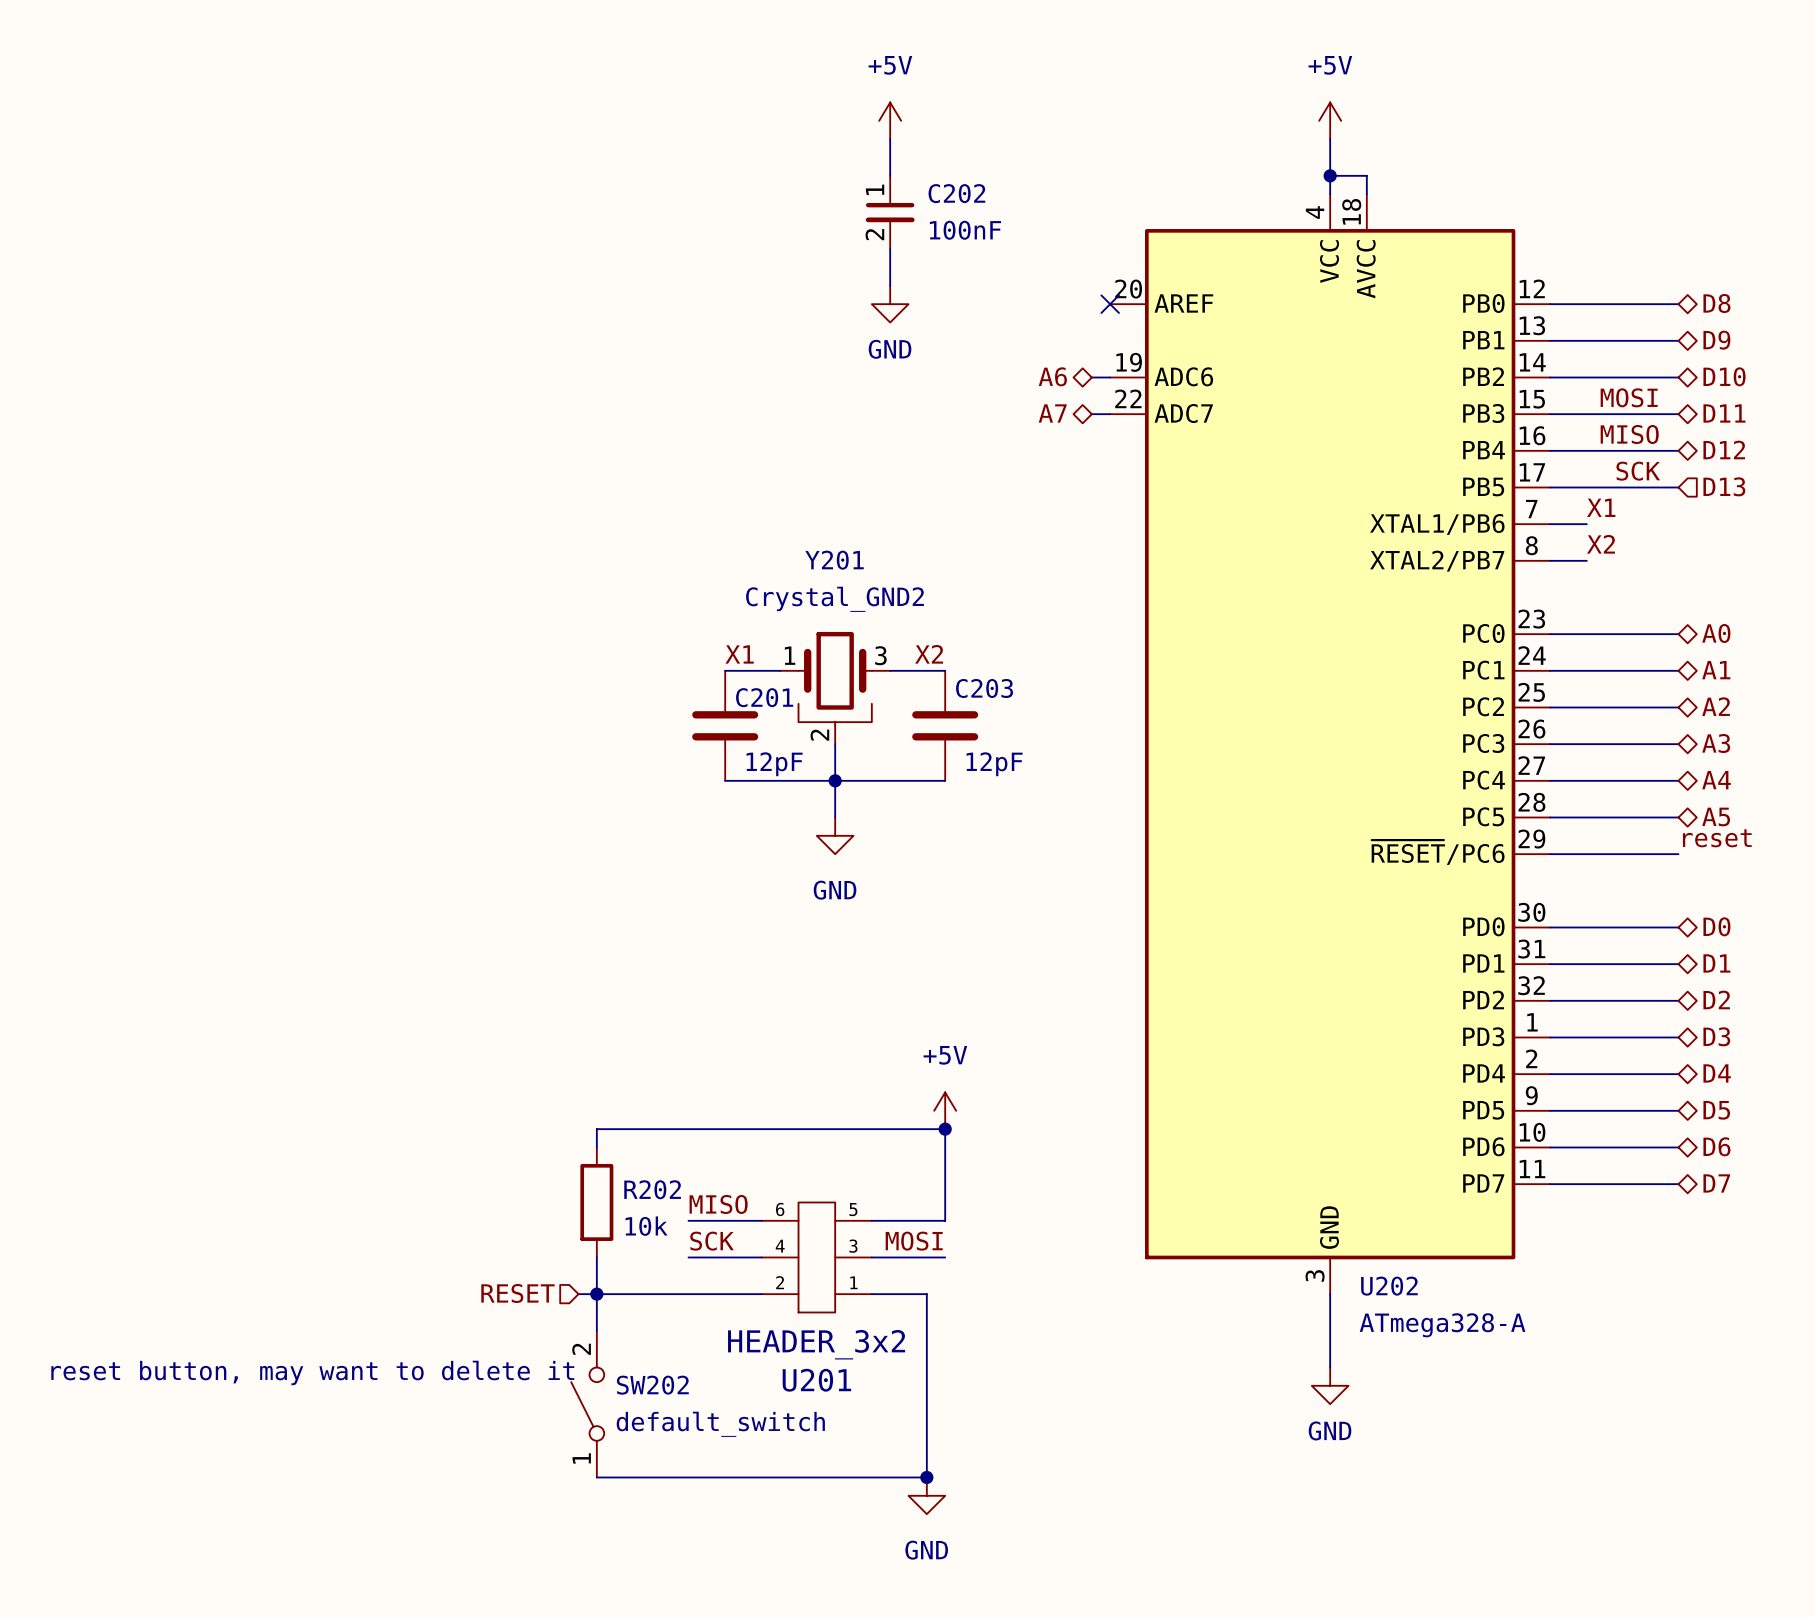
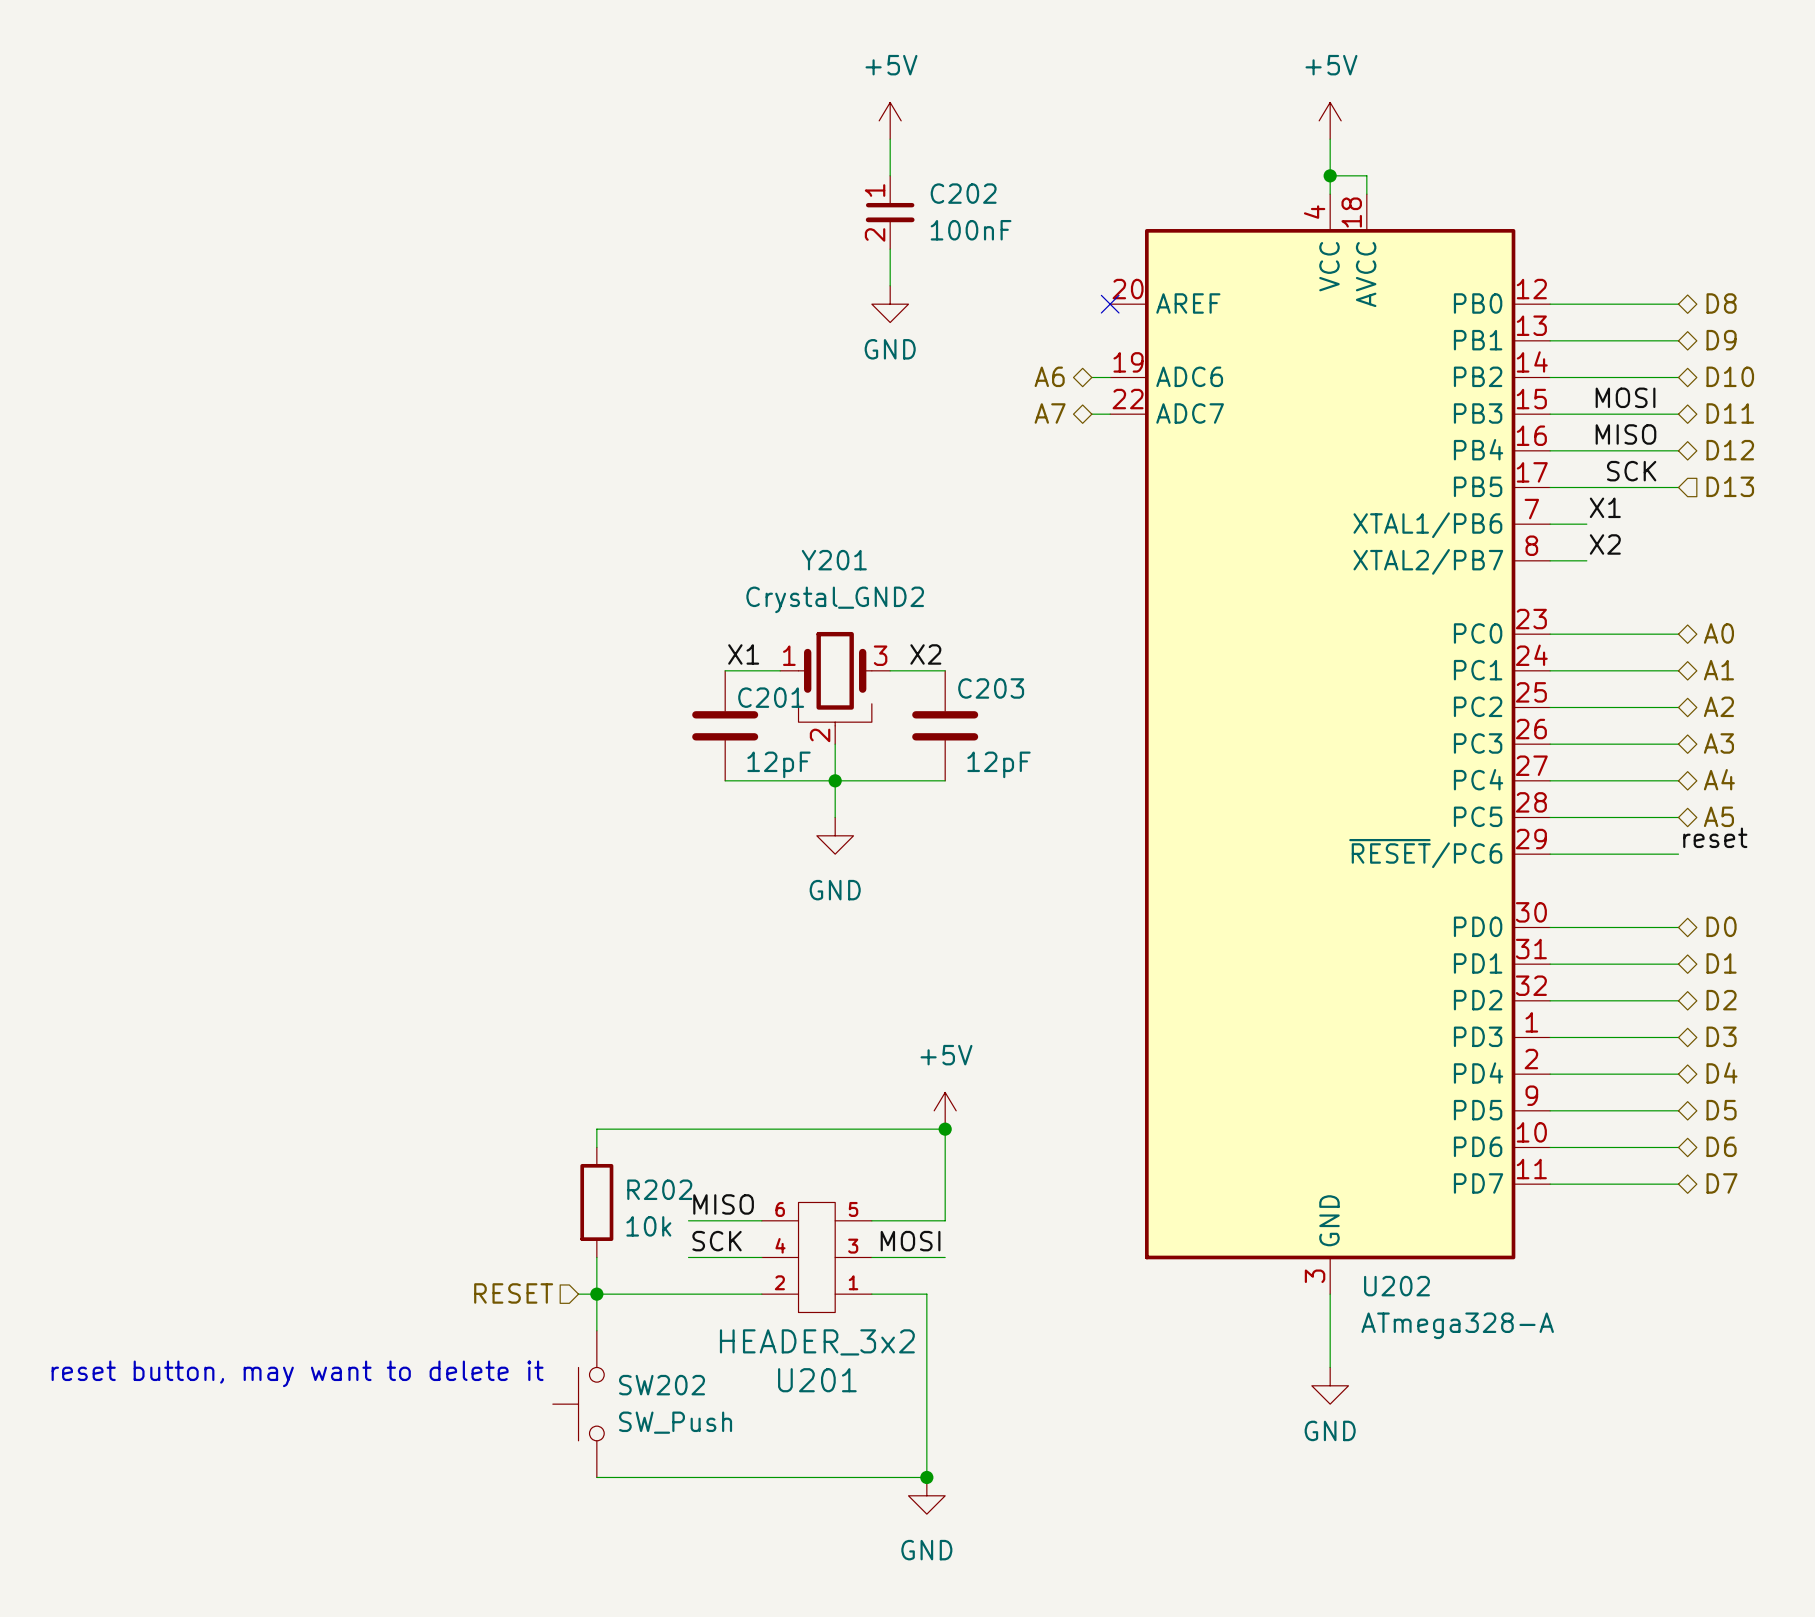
SW202 symbol: [571, 1330, 605, 1478] -> [552, 1330, 605, 1478]
SW202 value: default_switch (720, 1424) -> SW_Push (675, 1422)

